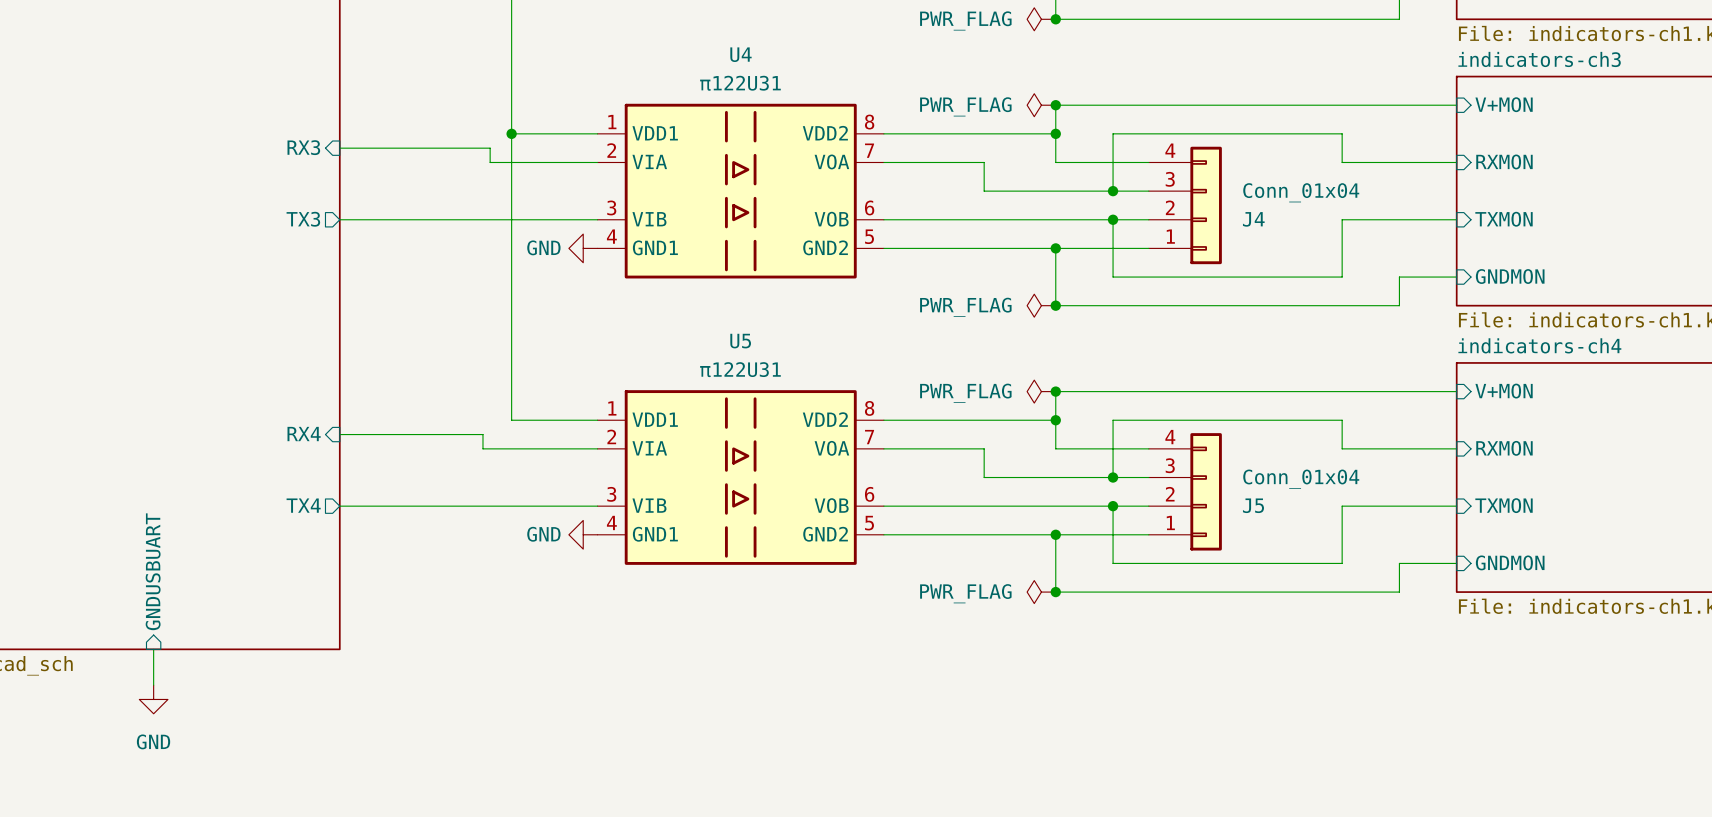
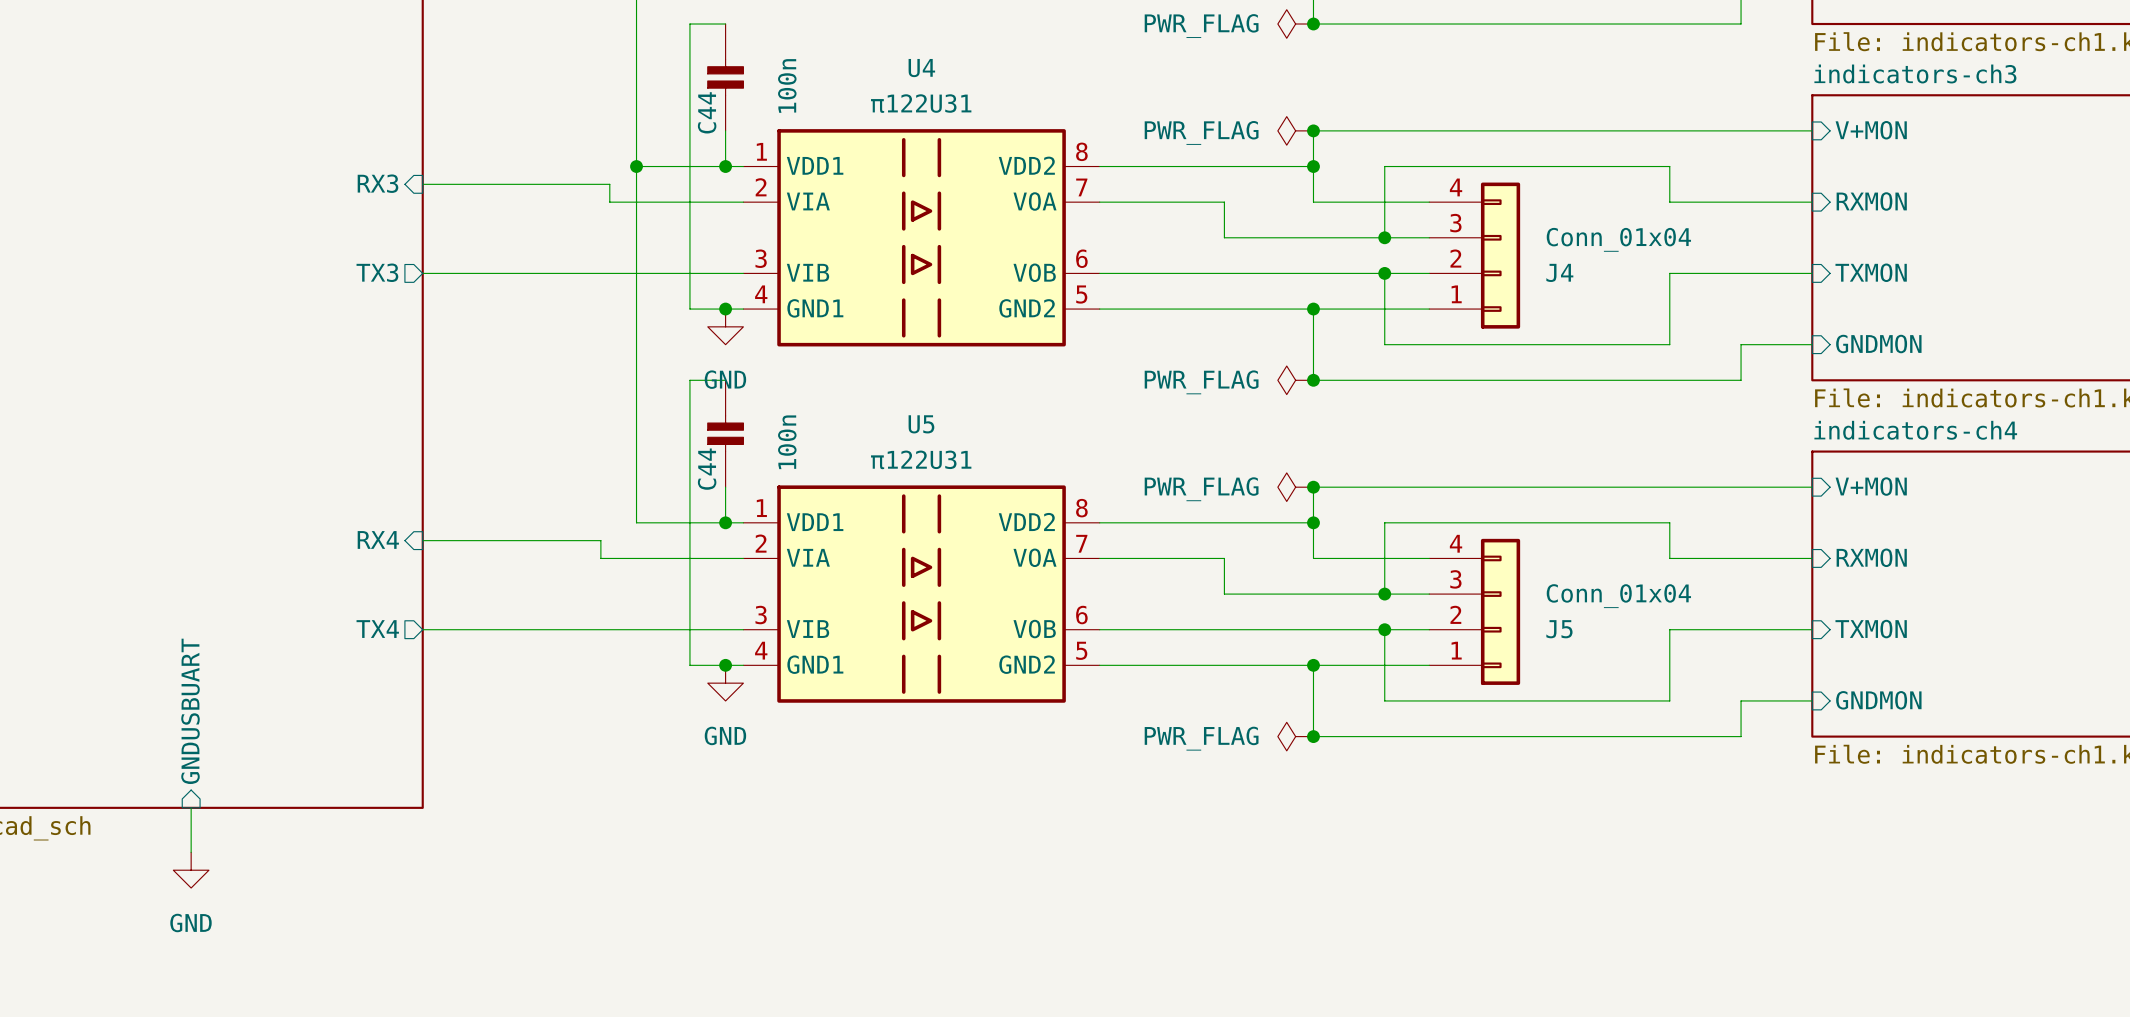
wire: none -> (725, 24) (689, 24) (689, 309) (743, 309)
C44: none -> 100n (725, 77)
wire: none -> (725, 130) (725, 166)
junction: none -> (725, 166)
power symbol rotation: 0° (583, 248) -> 90° counterclockwise (725, 326)
junction: none -> (725, 309)
wire: none -> (725, 380) (689, 380) (689, 665) (743, 665)
C44: none -> 100n (725, 433)
wire: none -> (725, 487) (725, 522)
junction: none -> (725, 522)
power symbol rotation: 0° (583, 534) -> 90° counterclockwise (725, 683)
junction: none -> (725, 665)

